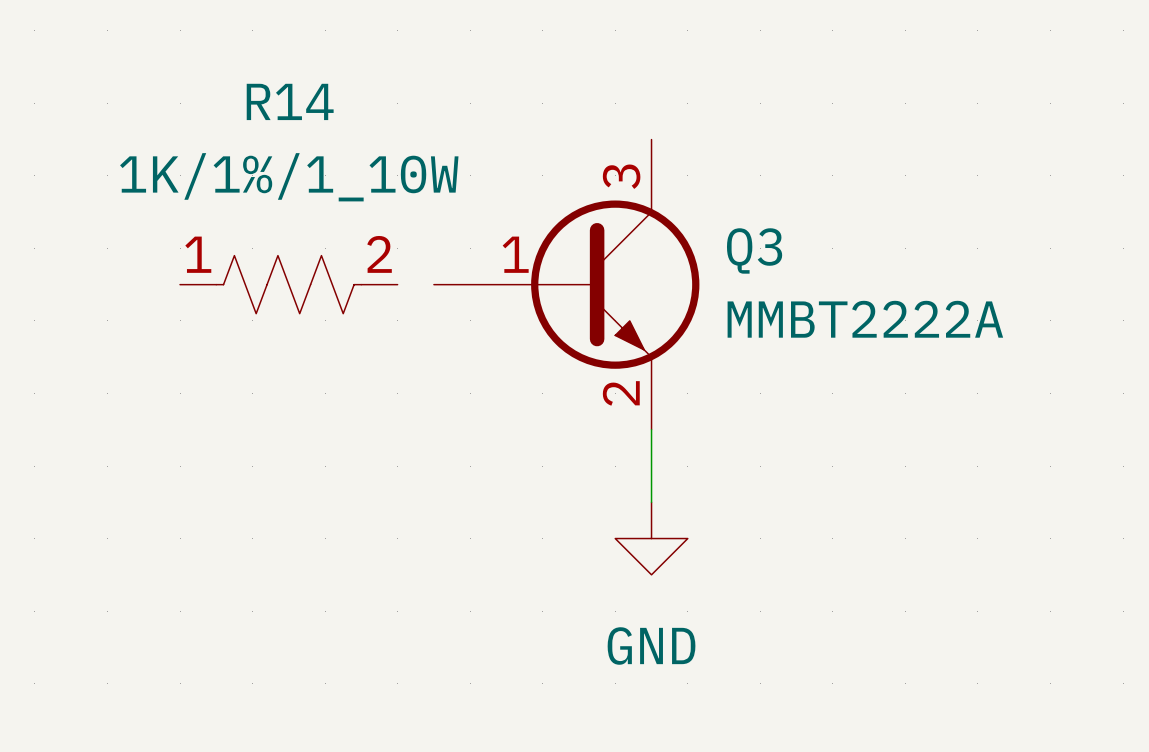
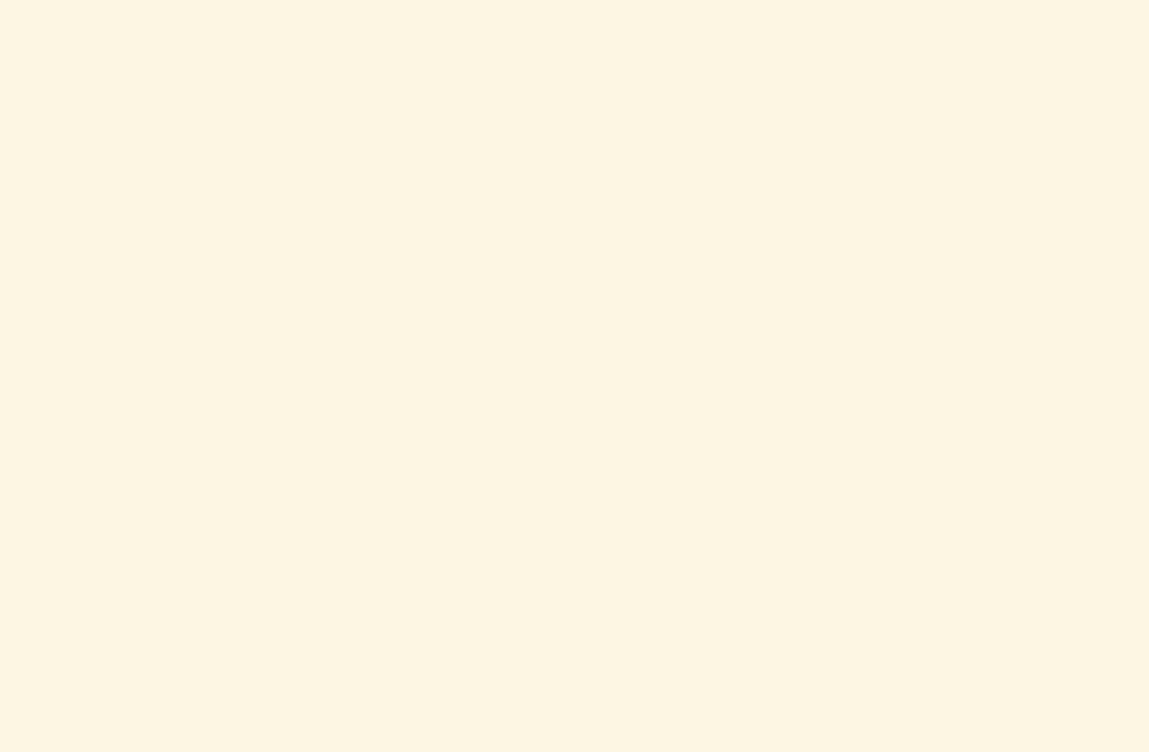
R14: 1K/1%/1_10W (288, 284) -> none
Q3: MMBT2222A (566, 284) -> none
wire: (651, 429) (651, 502) -> none
power symbol: GND (651, 538) -> none

